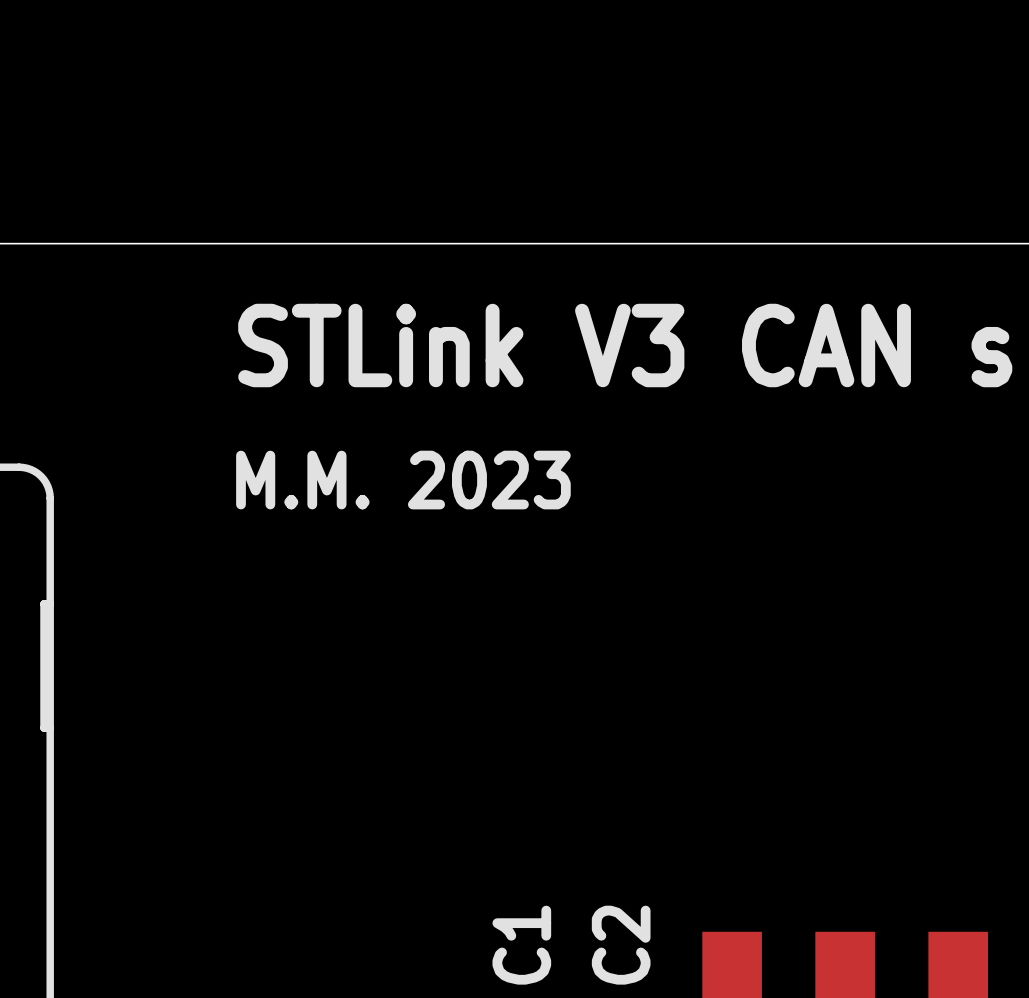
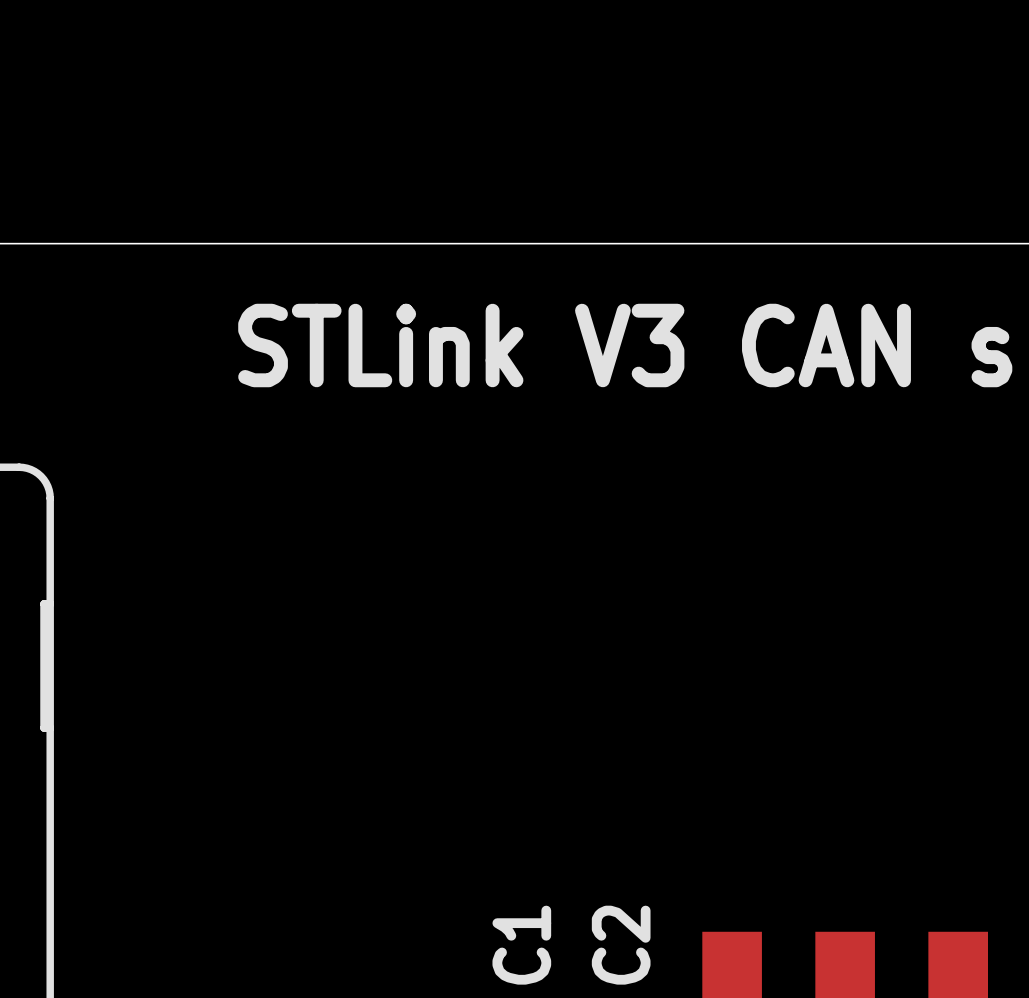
text: M.M. 2023 (403, 480) -> none

